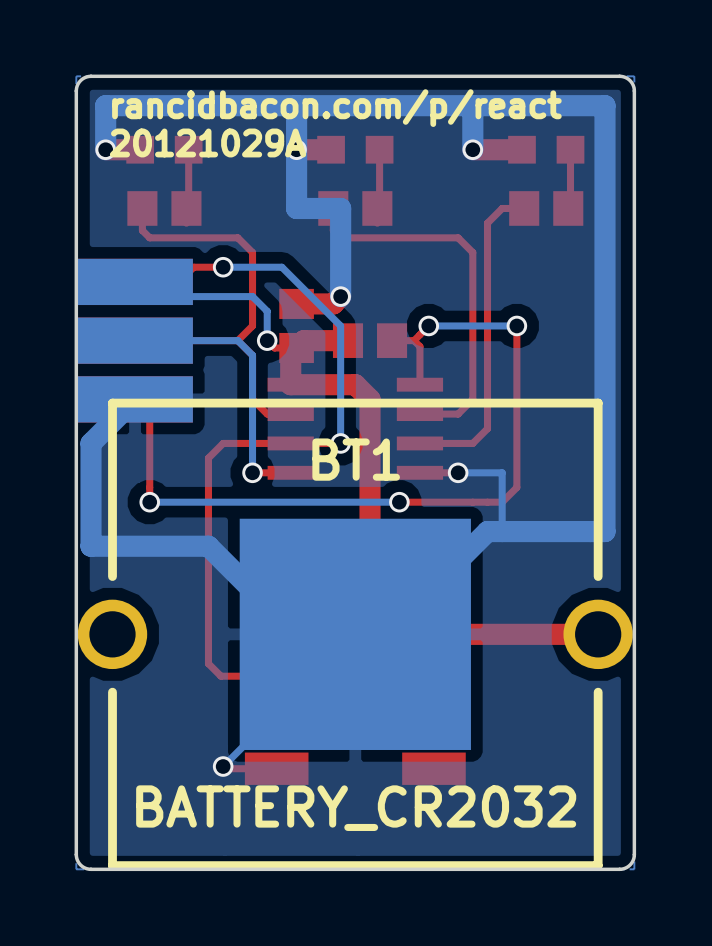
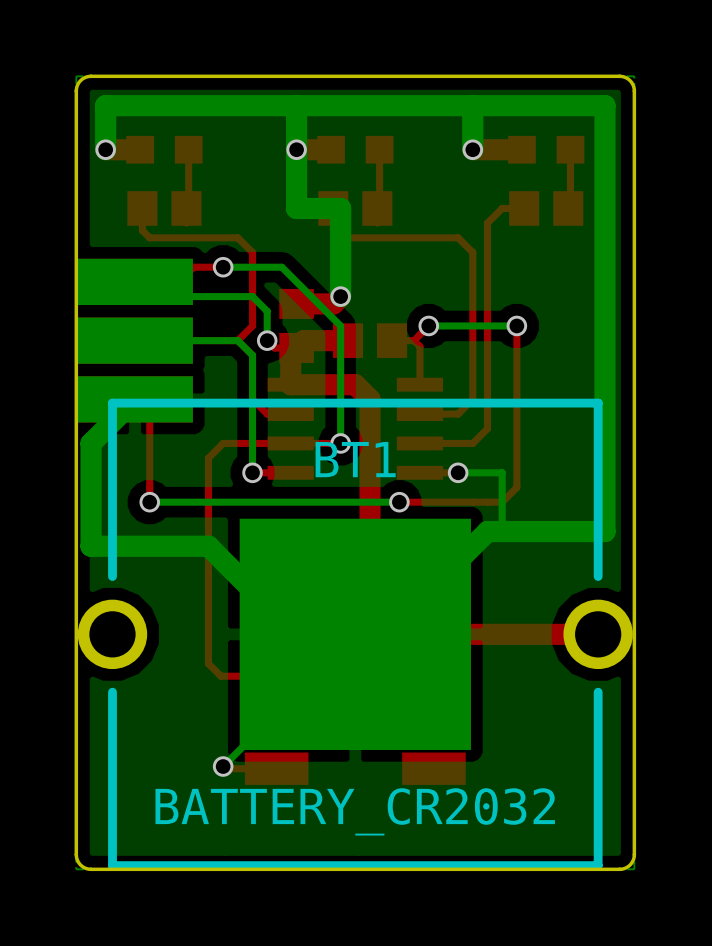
text: rancidbacon.com/p/react (336, 108) -> none
text: 20121029A (208, 142) -> none

